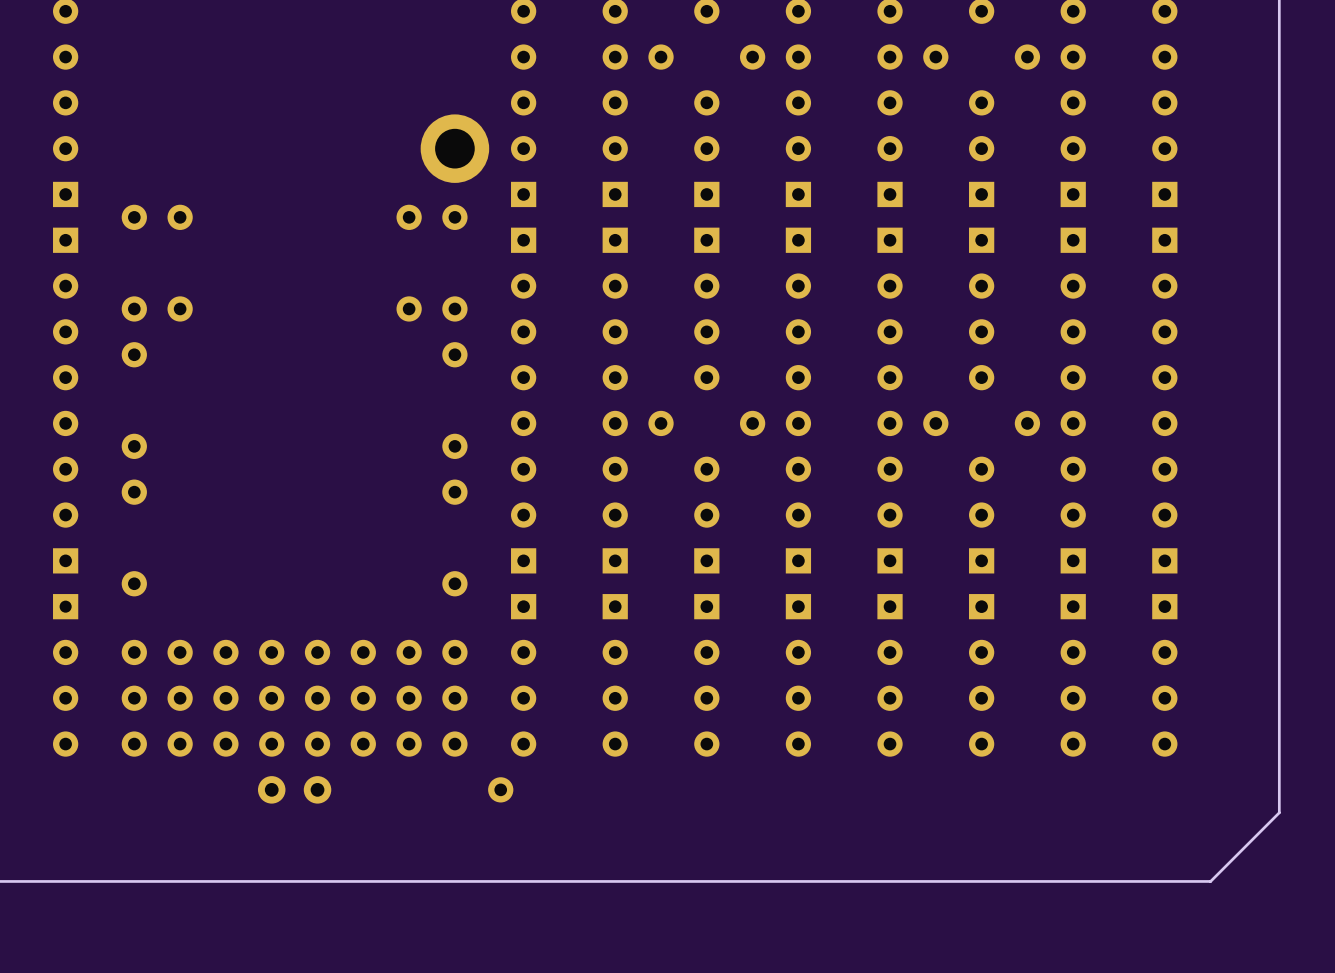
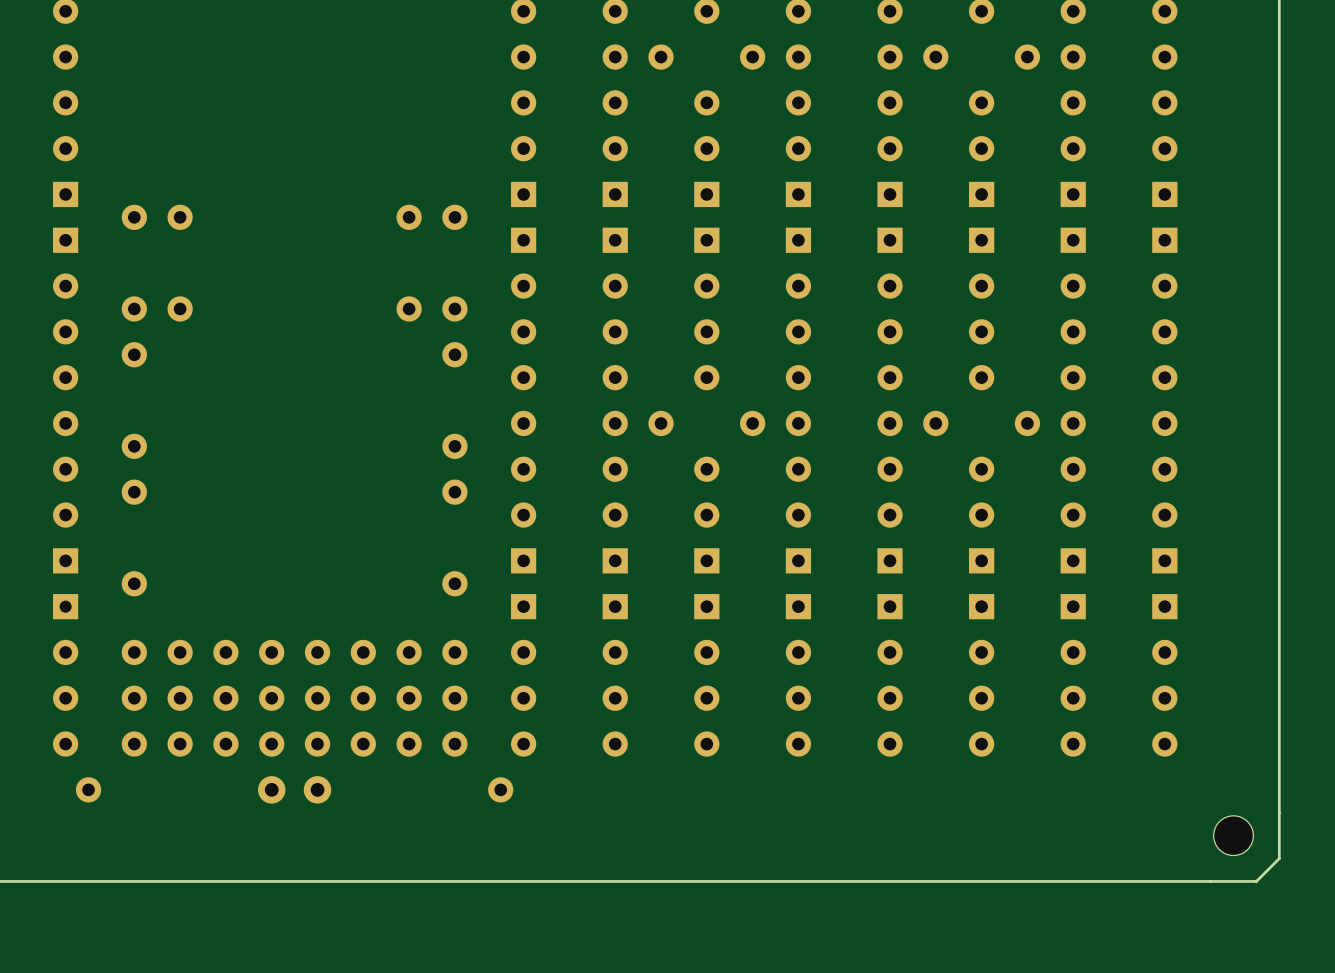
part: (454, 148) -> none
part: none -> (88, 789)
board edge: (1279, 812) (1210, 881) -> (1279, 812) (1279, 858) (1256, 881) (1210, 881)
part: none -> (1233, 835)

